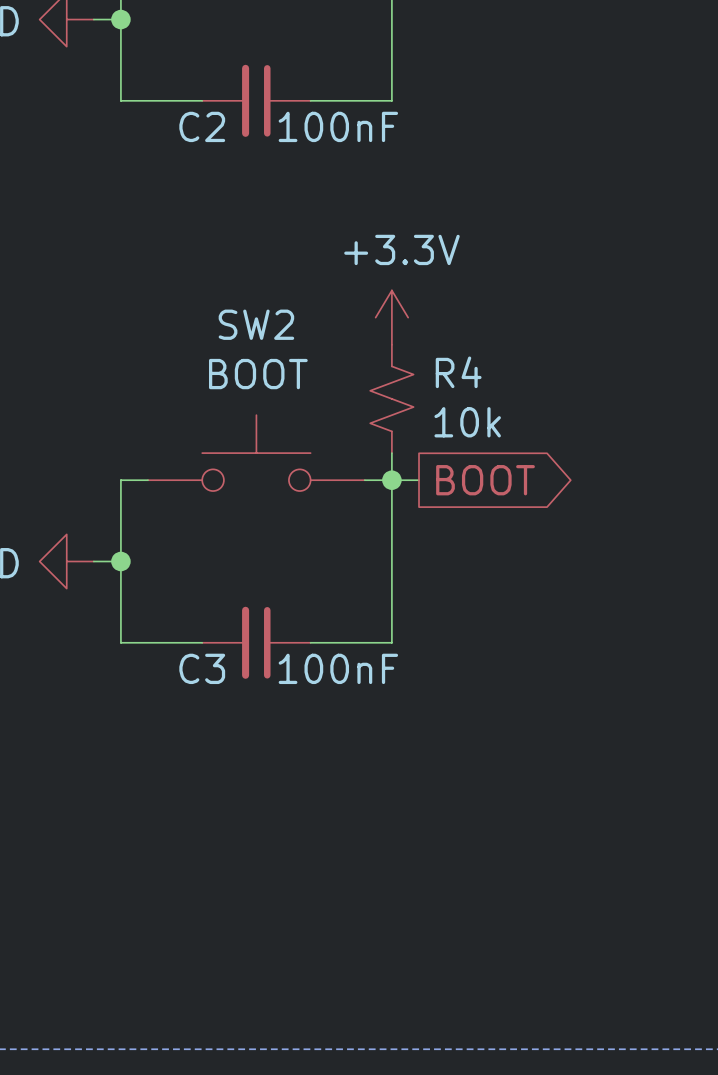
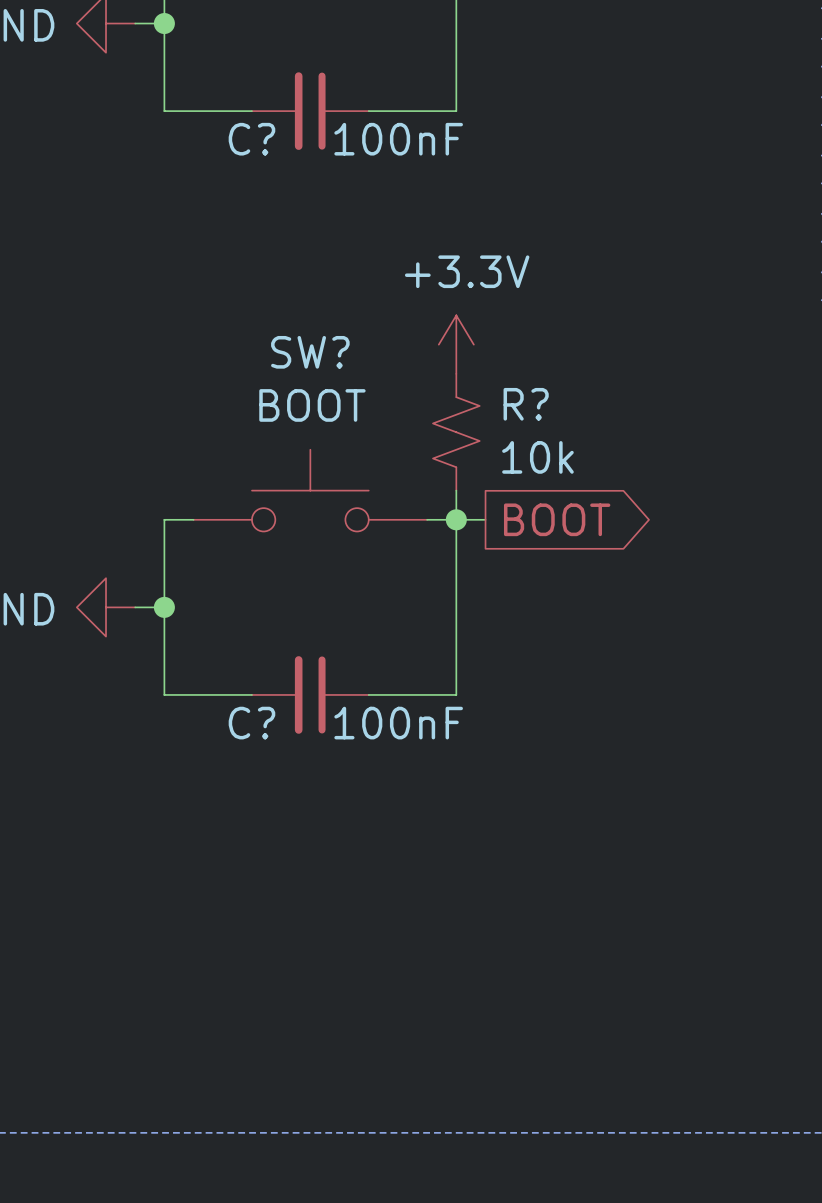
C2 name: C2 (202, 126) -> C? (251, 139)
SW2 name: SW2 (256, 324) -> SW? (310, 352)
R4 name: R4 (458, 372) -> R? (526, 404)
C3 name: C3 (202, 668) -> C? (251, 723)

